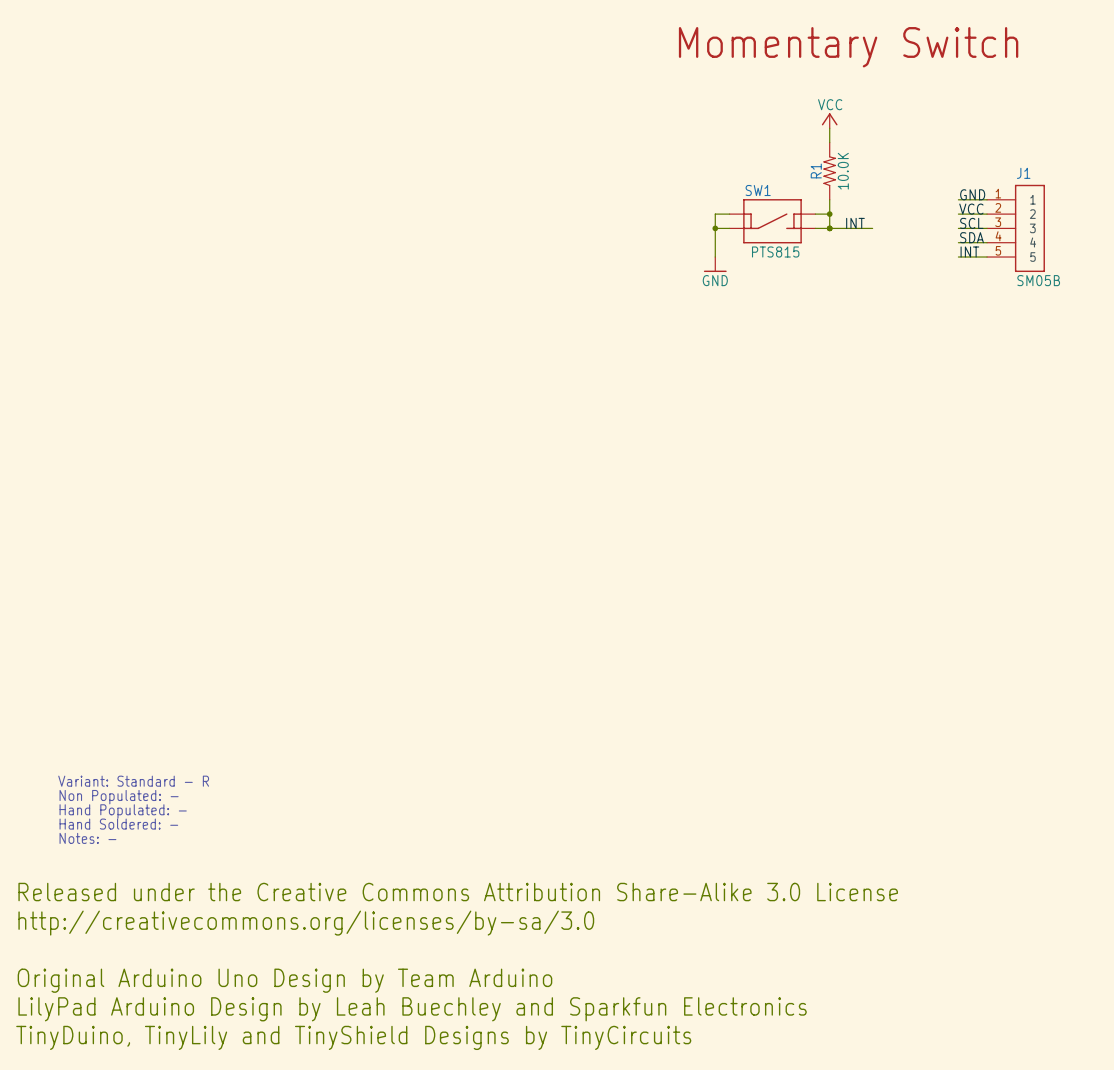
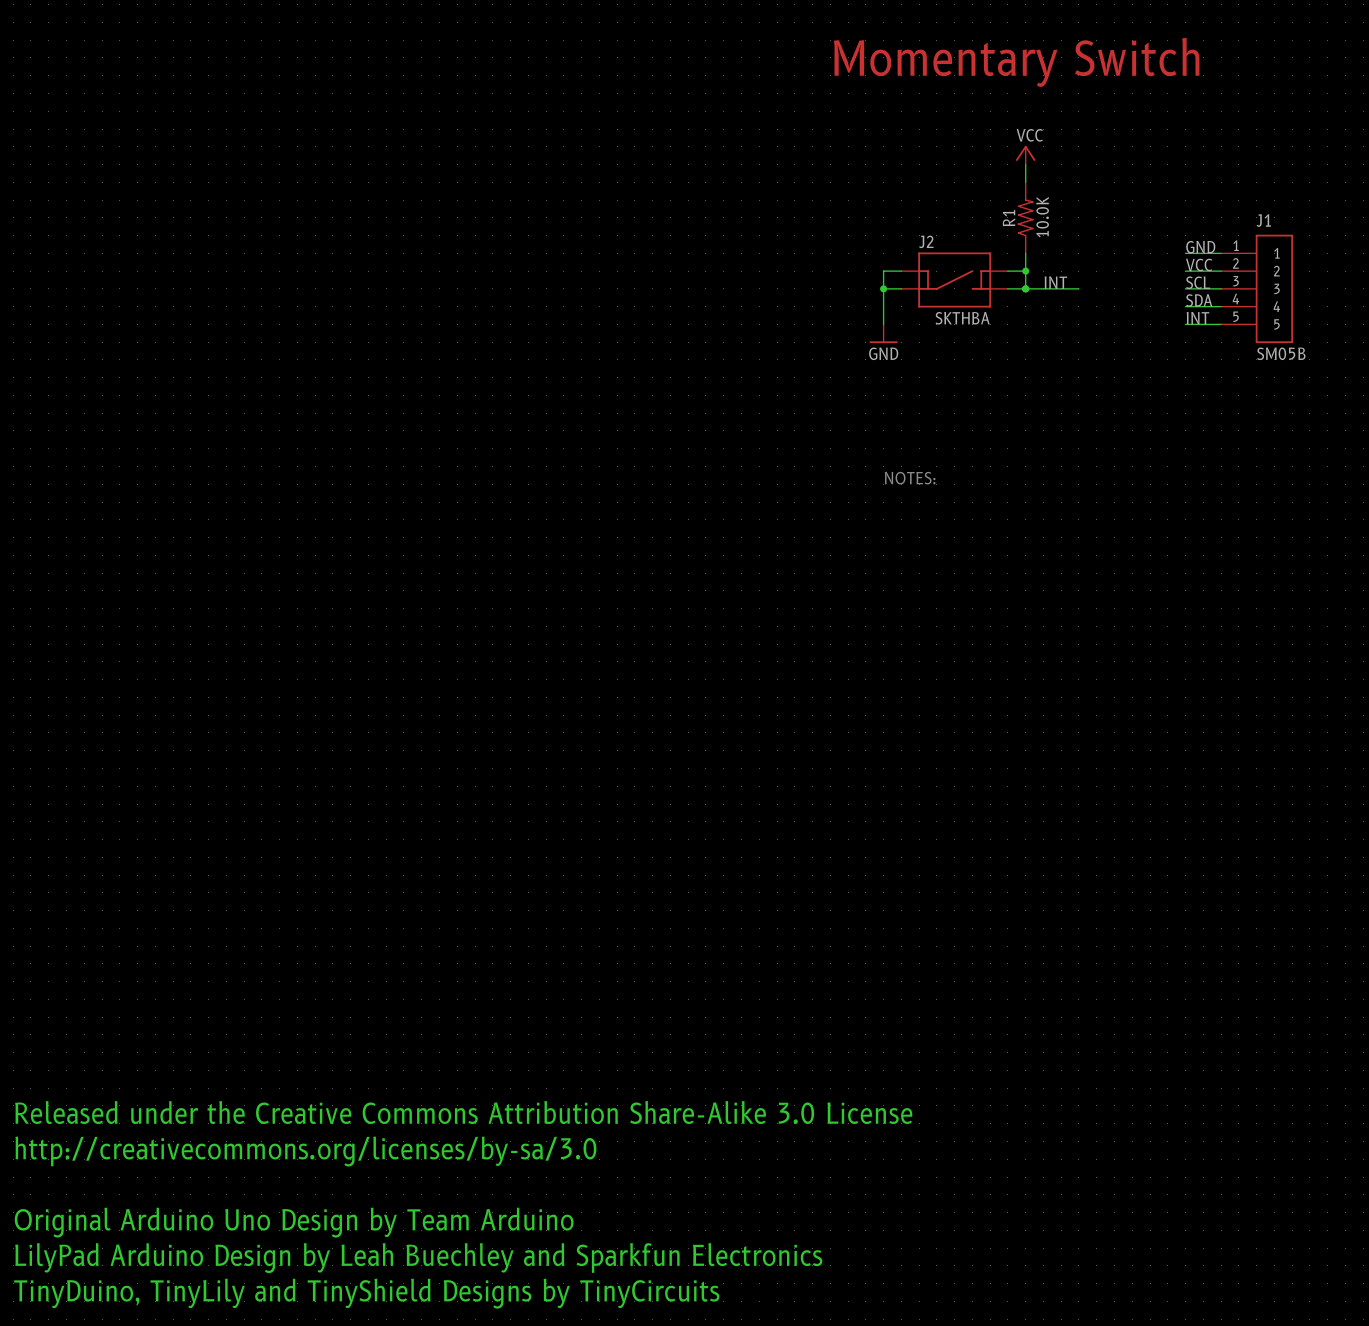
SW1 name: SW1 (758, 190) -> J2 (926, 241)
SW1 value: PTS815 (775, 252) -> SKTHBA (962, 318)
text: none -> NOTES: (910, 478)
text: Variant: Standard - R (133, 781) -> none
text: Non Populated: - (119, 797) -> none
text: Hand Populated: - (123, 811) -> none
text: Hand Soldered: - (118, 824) -> none
text: Notes: - (87, 838) -> none

